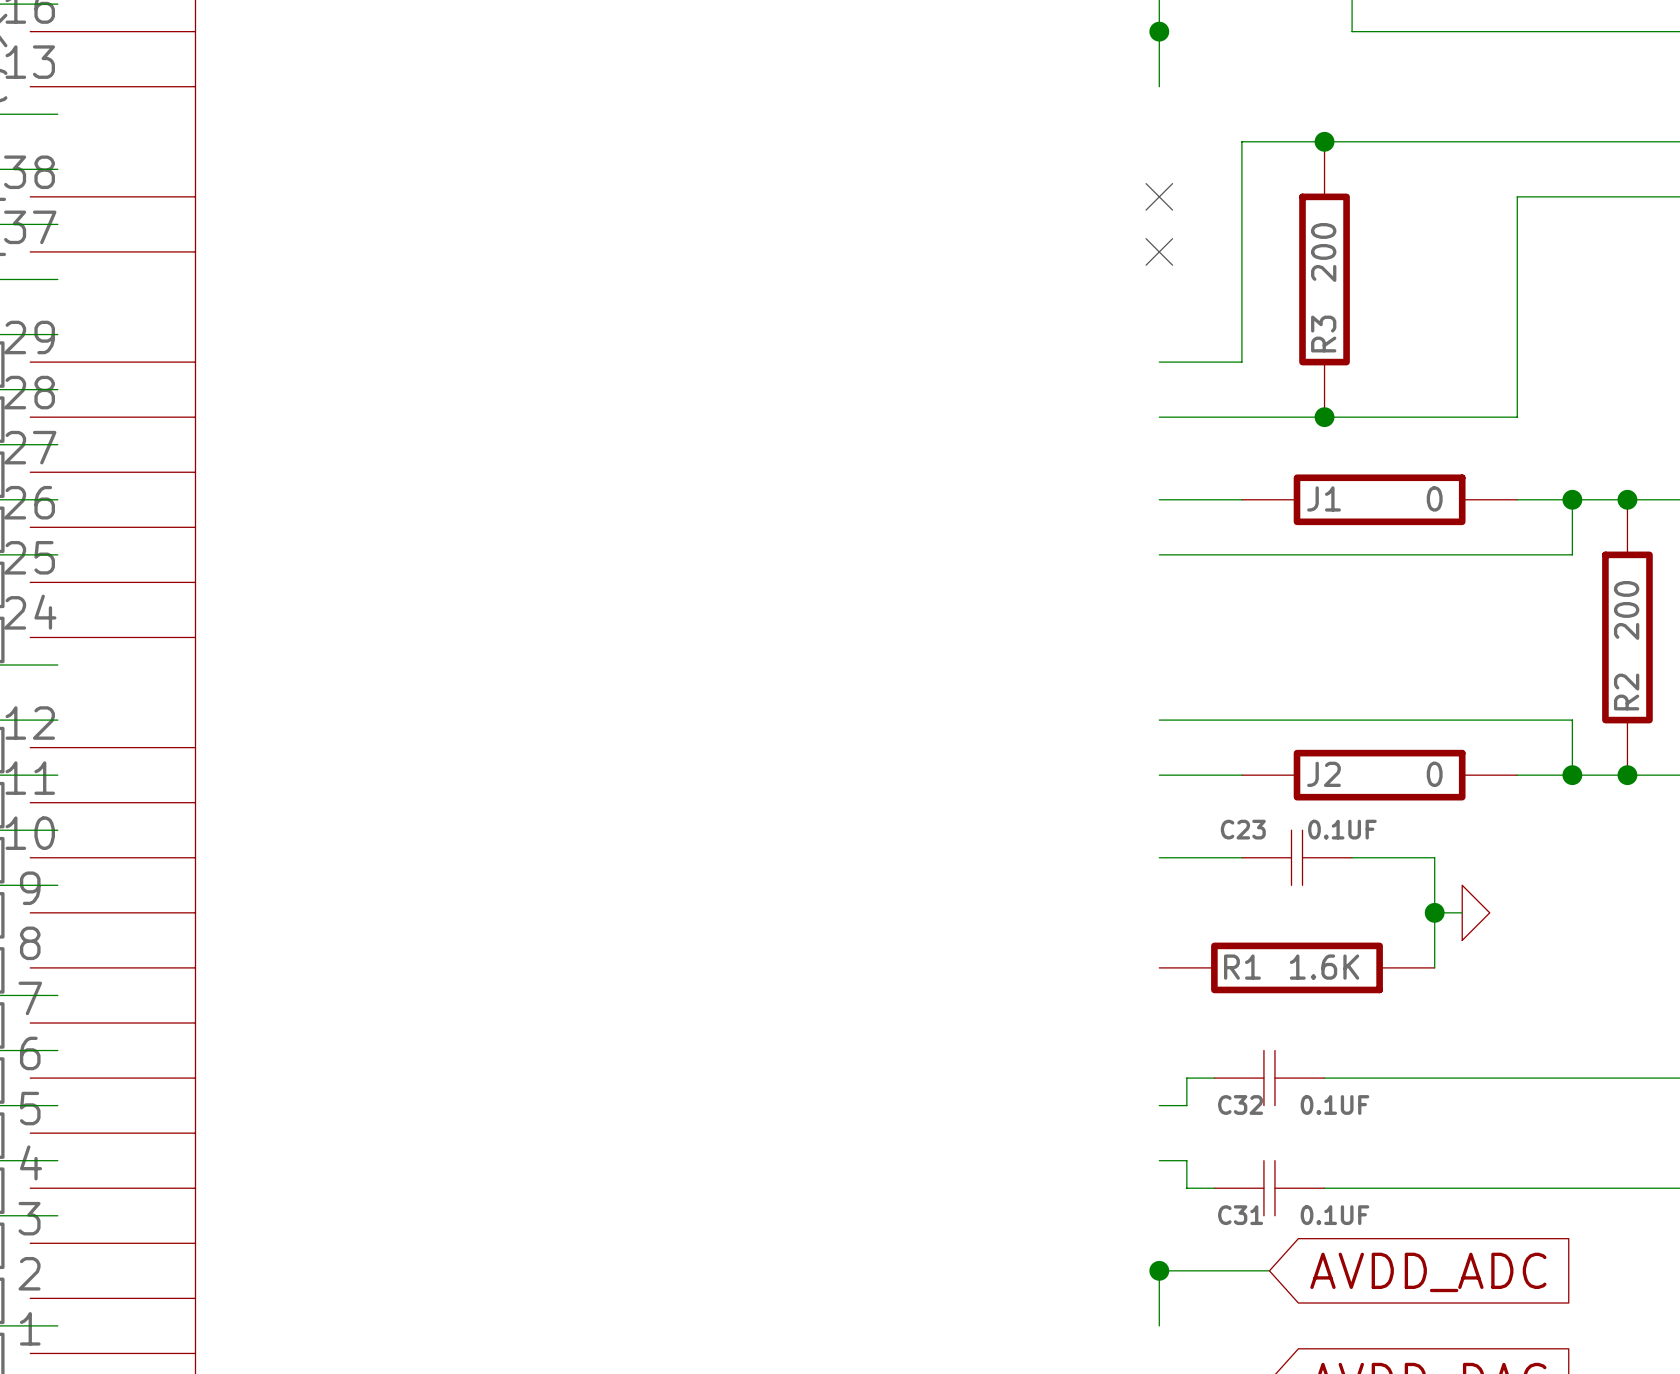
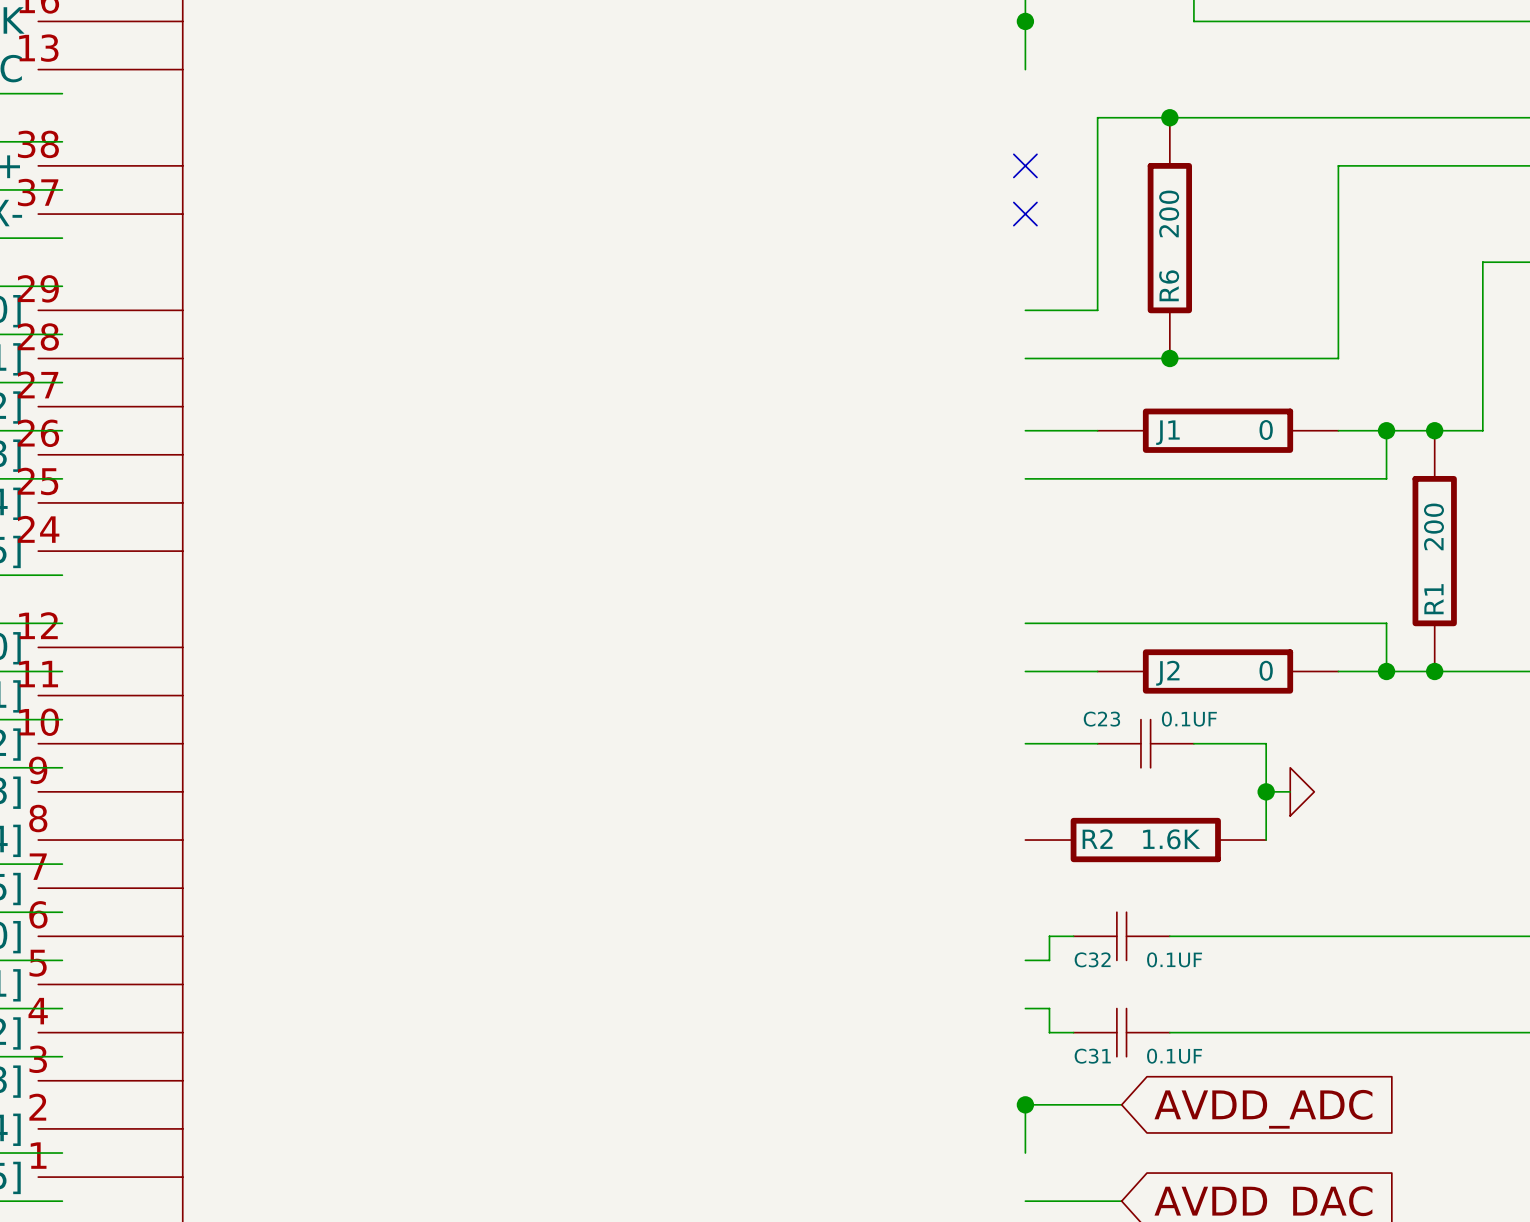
R3 name: R3 (1323, 334) -> R6 (1169, 285)
R2 name: R2 (1626, 692) -> R1 (1433, 599)
R1 name: R1 (1242, 967) -> R2 (1097, 839)

